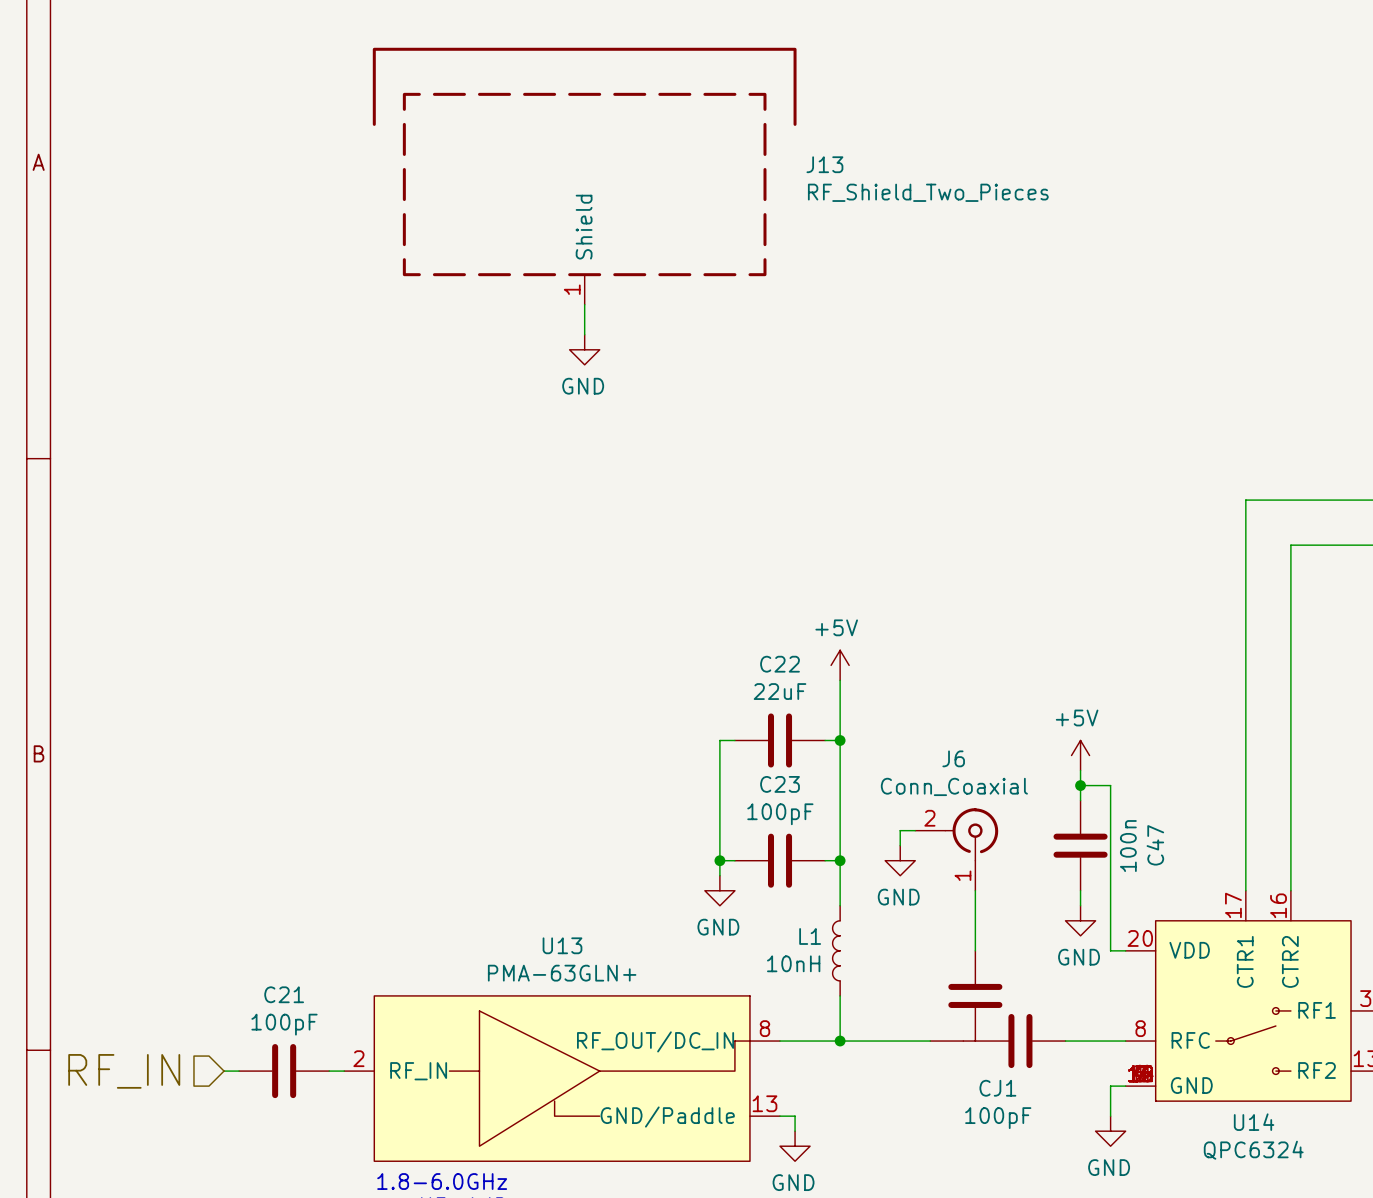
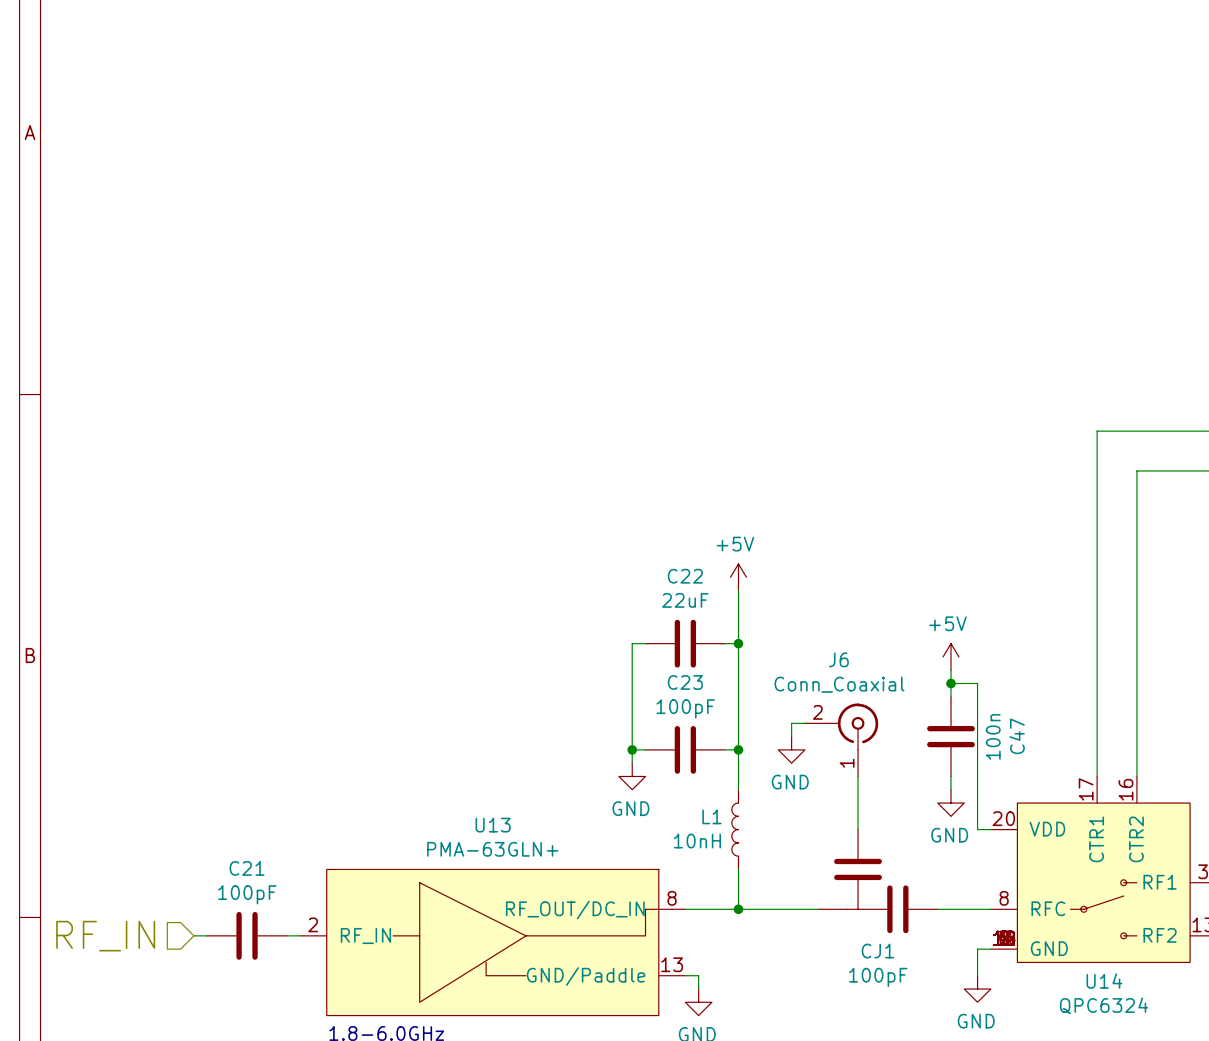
J13: RF_Shield_Two_Pieces (584, 176) -> none
wire: (584, 304) (584, 334) -> none
power symbol: GND (584, 349) -> none

